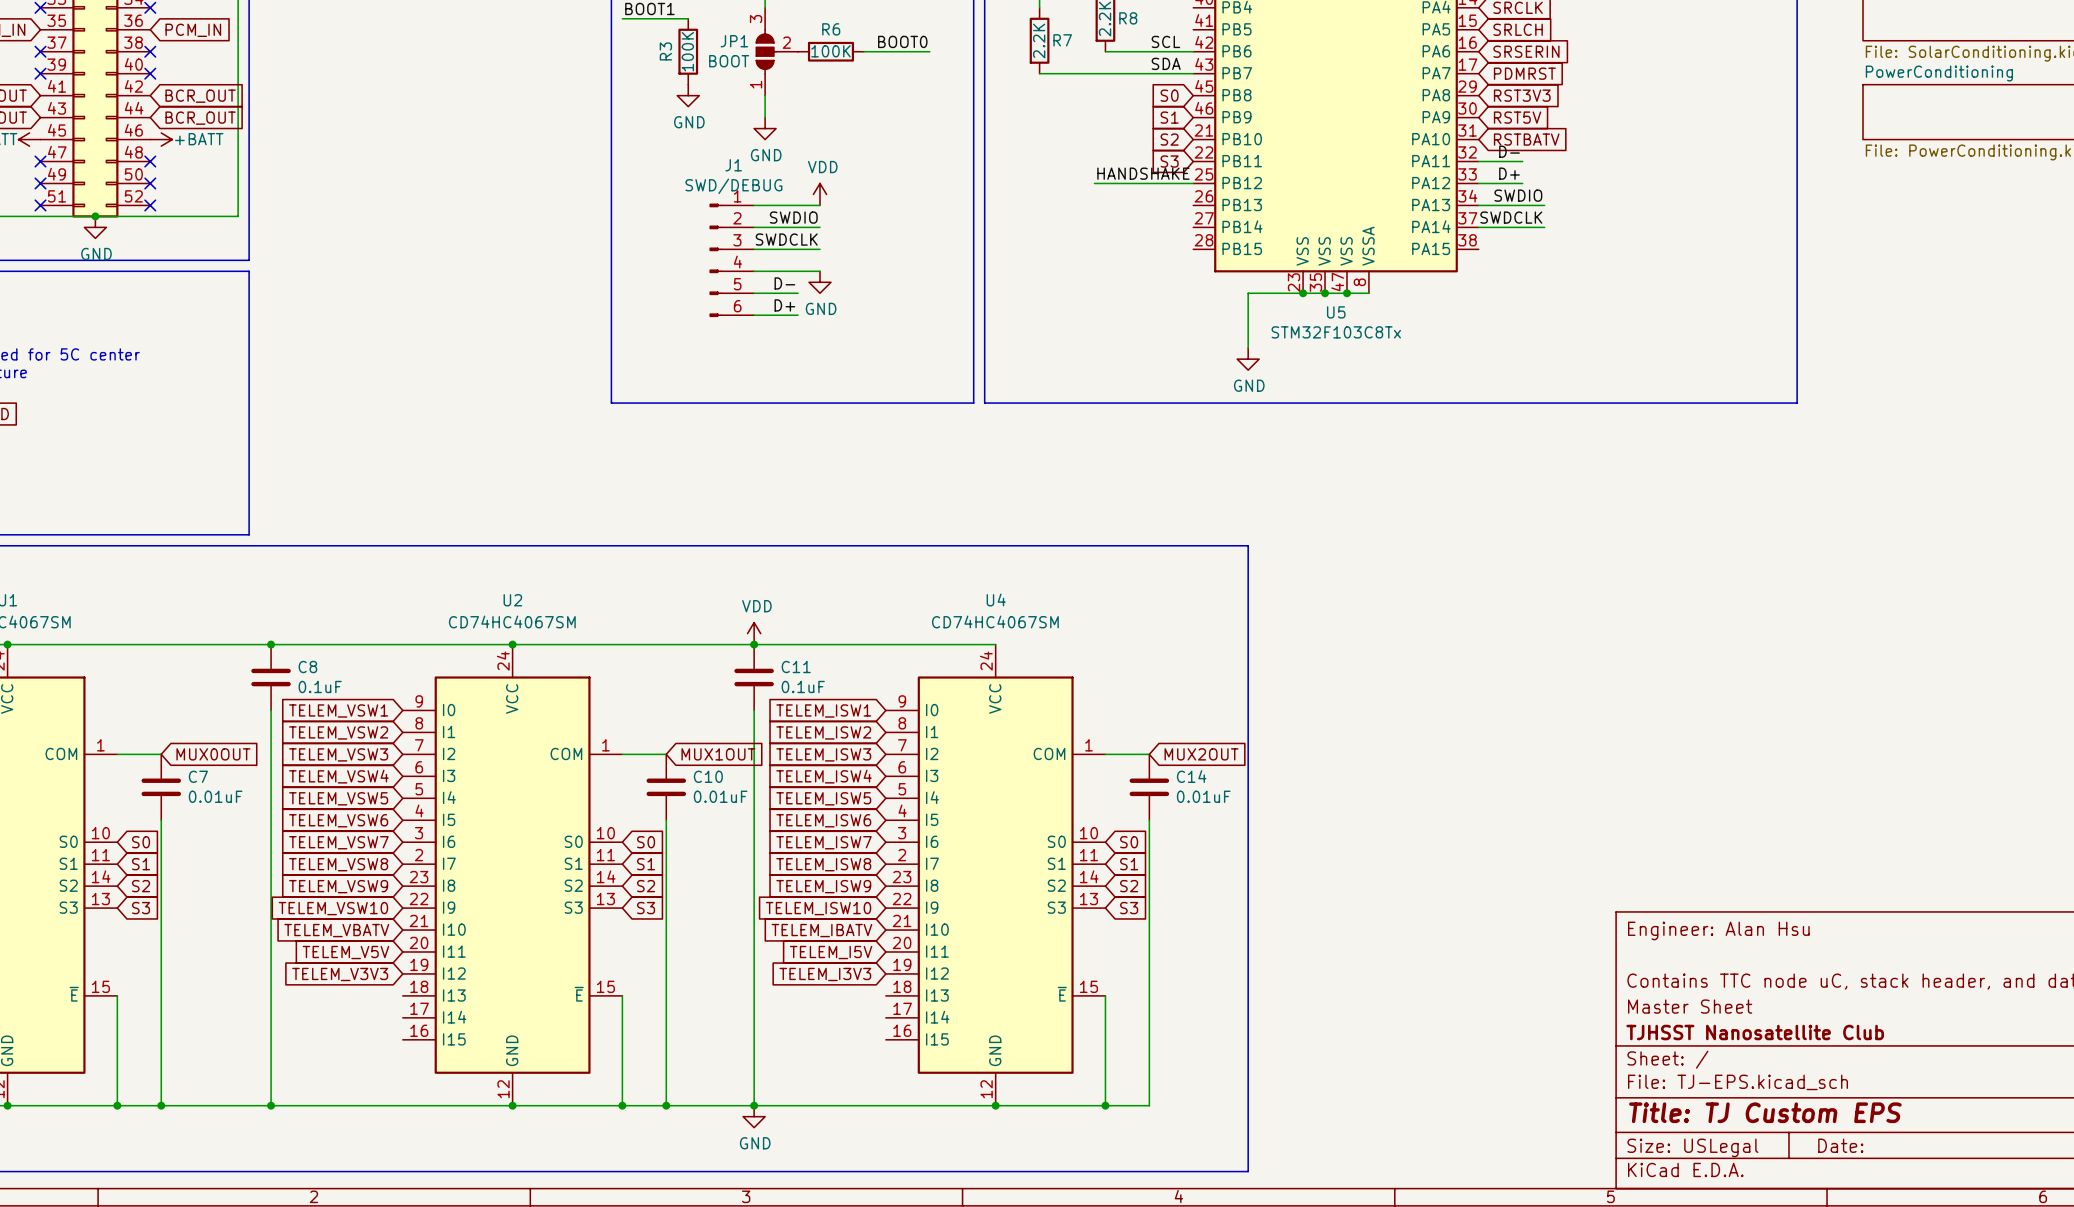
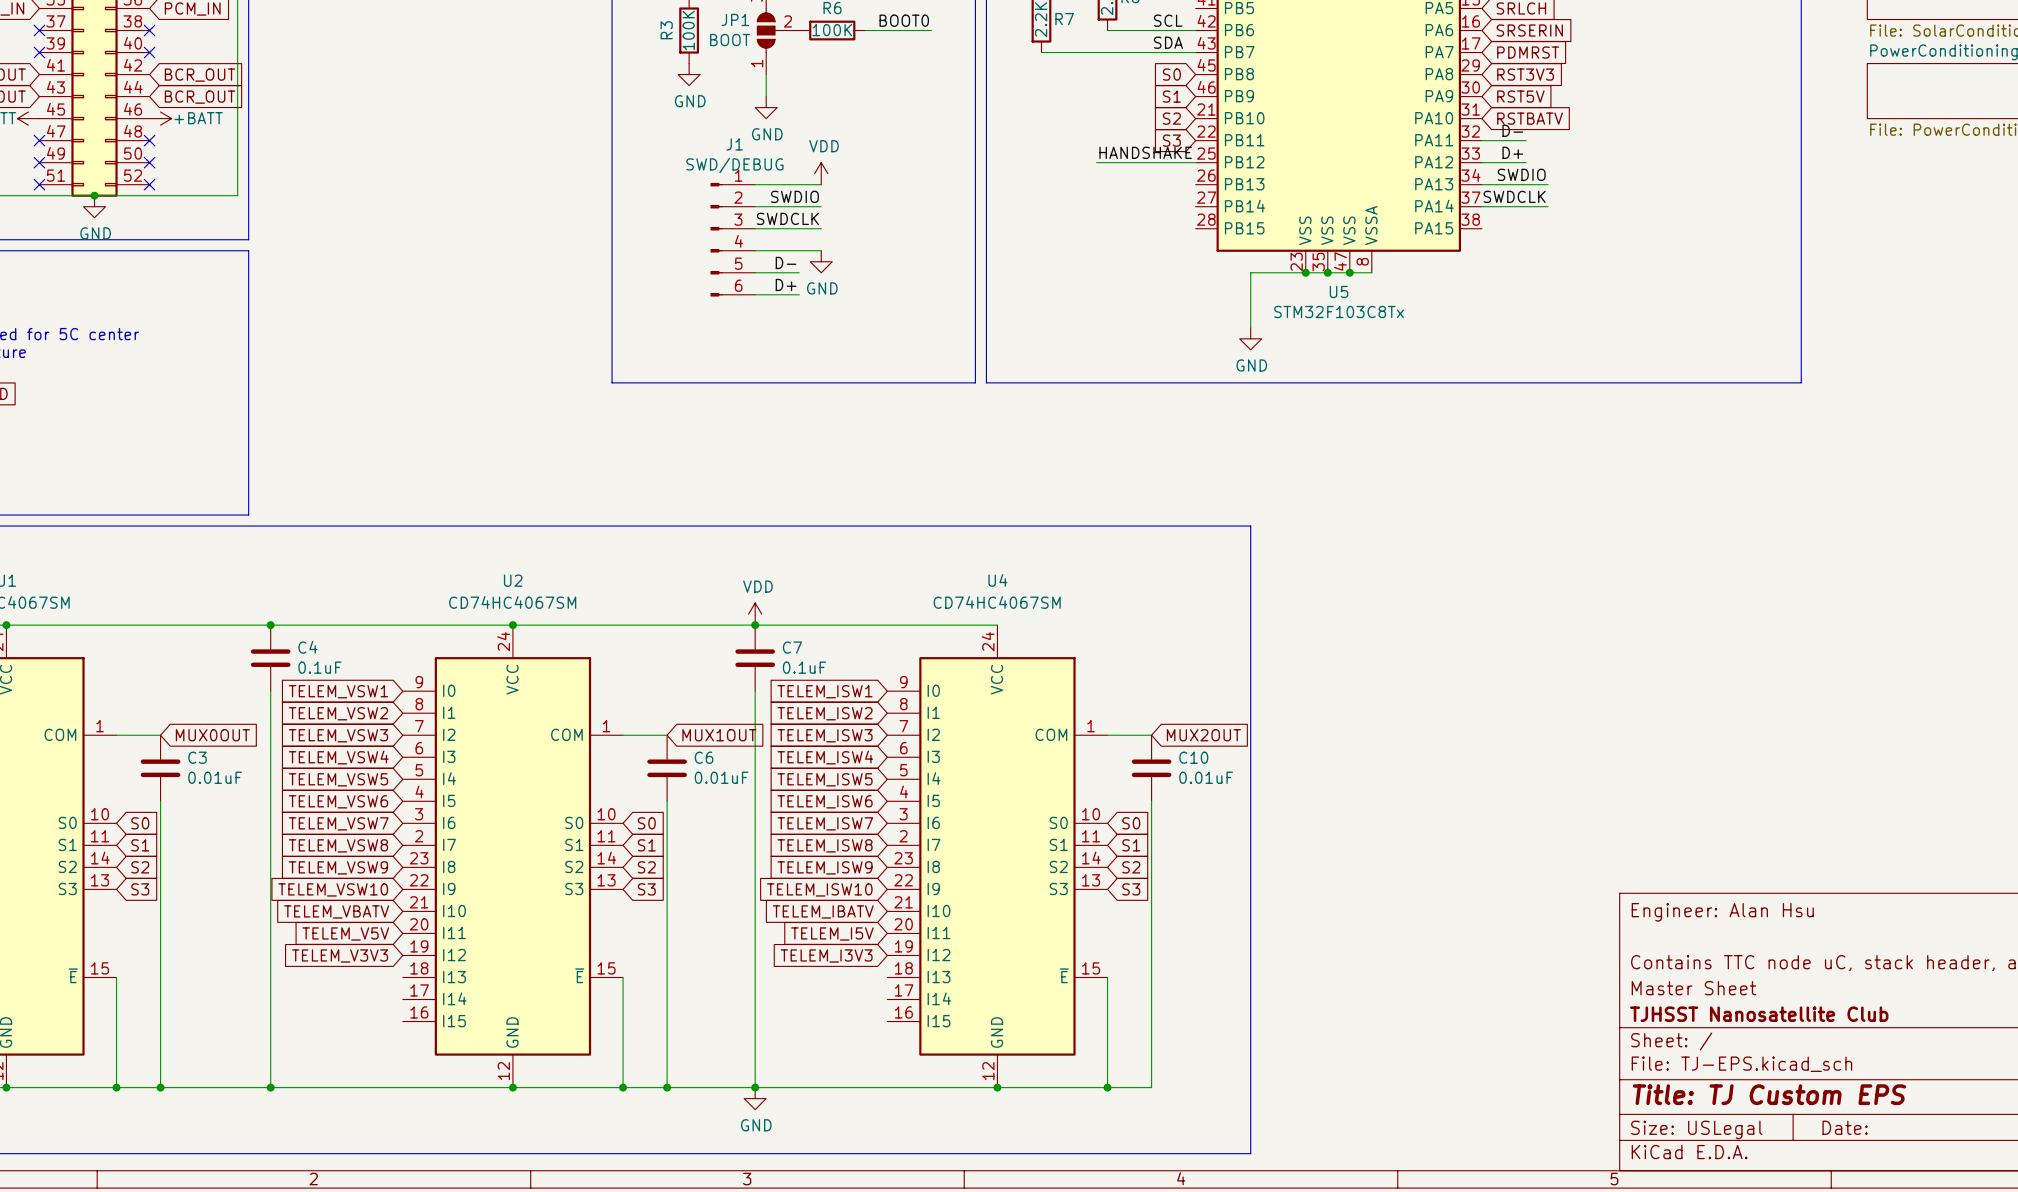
C8 name: C8 (307, 667) -> C4 (307, 647)
C11 name: C11 (796, 667) -> C7 (792, 647)
C7 name: C7 (198, 776) -> C3 (197, 757)
C10 name: C10 (708, 776) -> C6 (704, 757)
C14 name: C14 (1191, 776) -> C10 (1193, 757)

